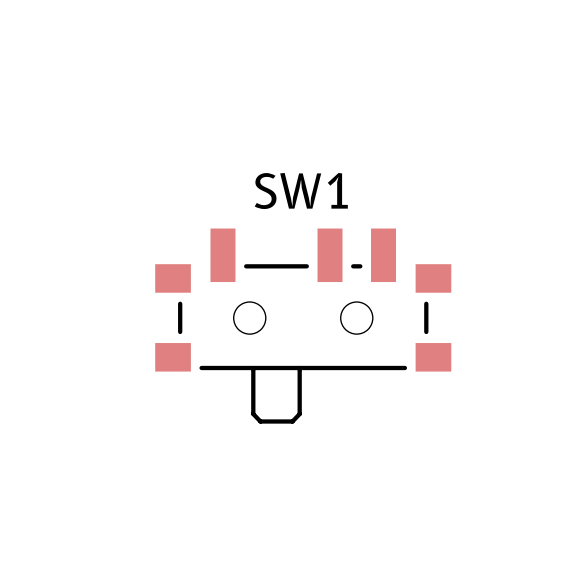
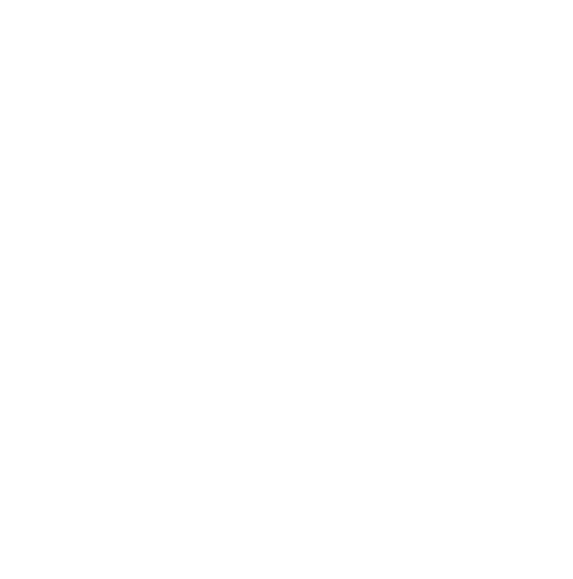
SW1: (303, 326) -> none

